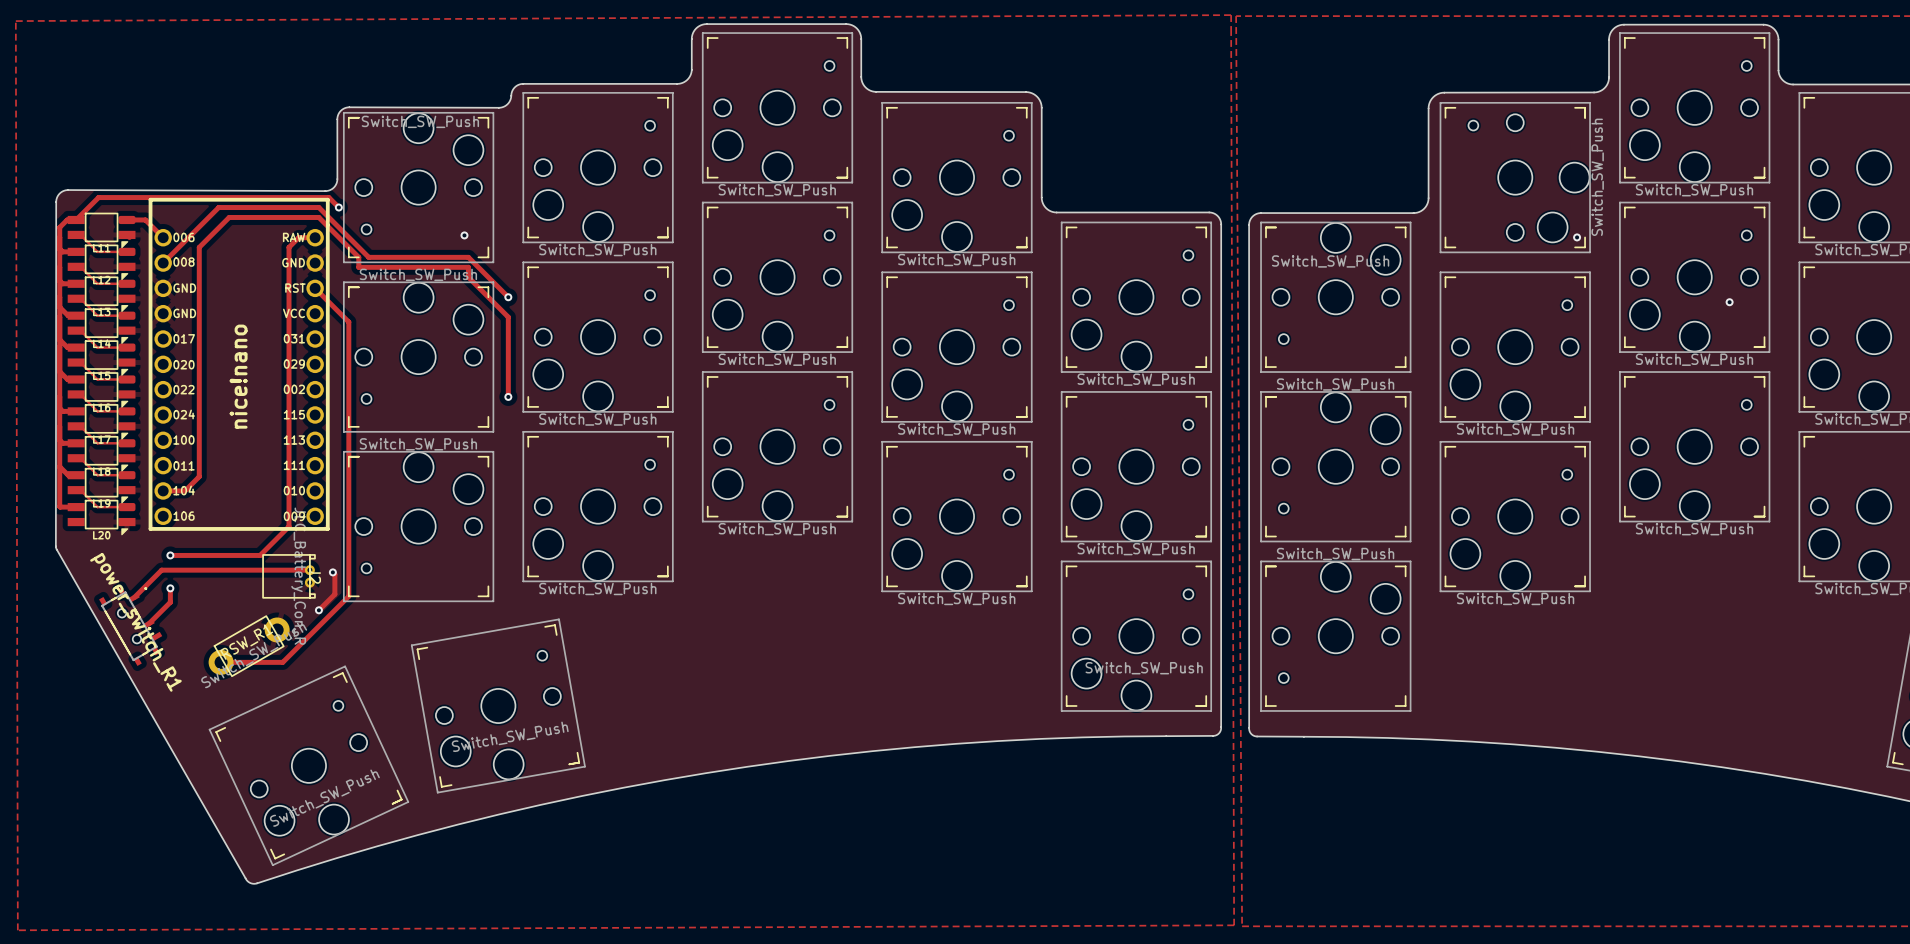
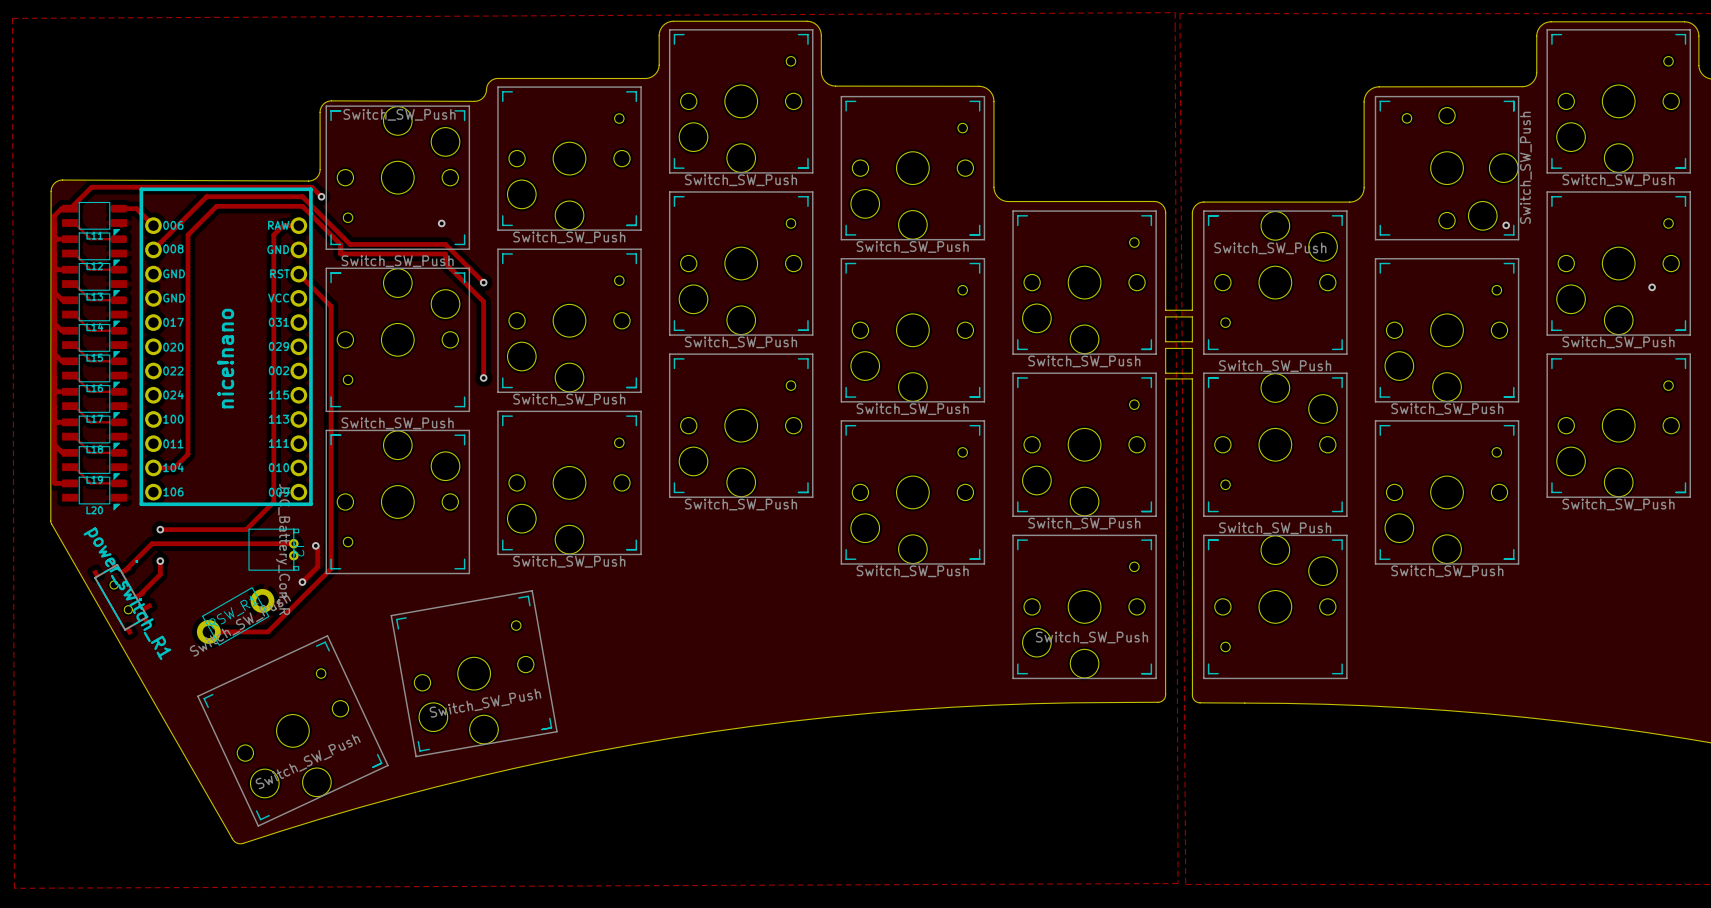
board edge: (1221, 224) (1221, 397) -> (1165, 212) (1165, 310) (1192, 310) (1192, 213)
board edge: (1249, 225) (1249, 727) -> (1165, 378) (1192, 378) (1192, 694)
board edge: none -> (1165, 316) (1192, 316) (1192, 341) (1165, 341) (1165, 316)
board edge: none -> (1165, 348) (1192, 348) (1192, 373) (1165, 373) (1165, 348)

